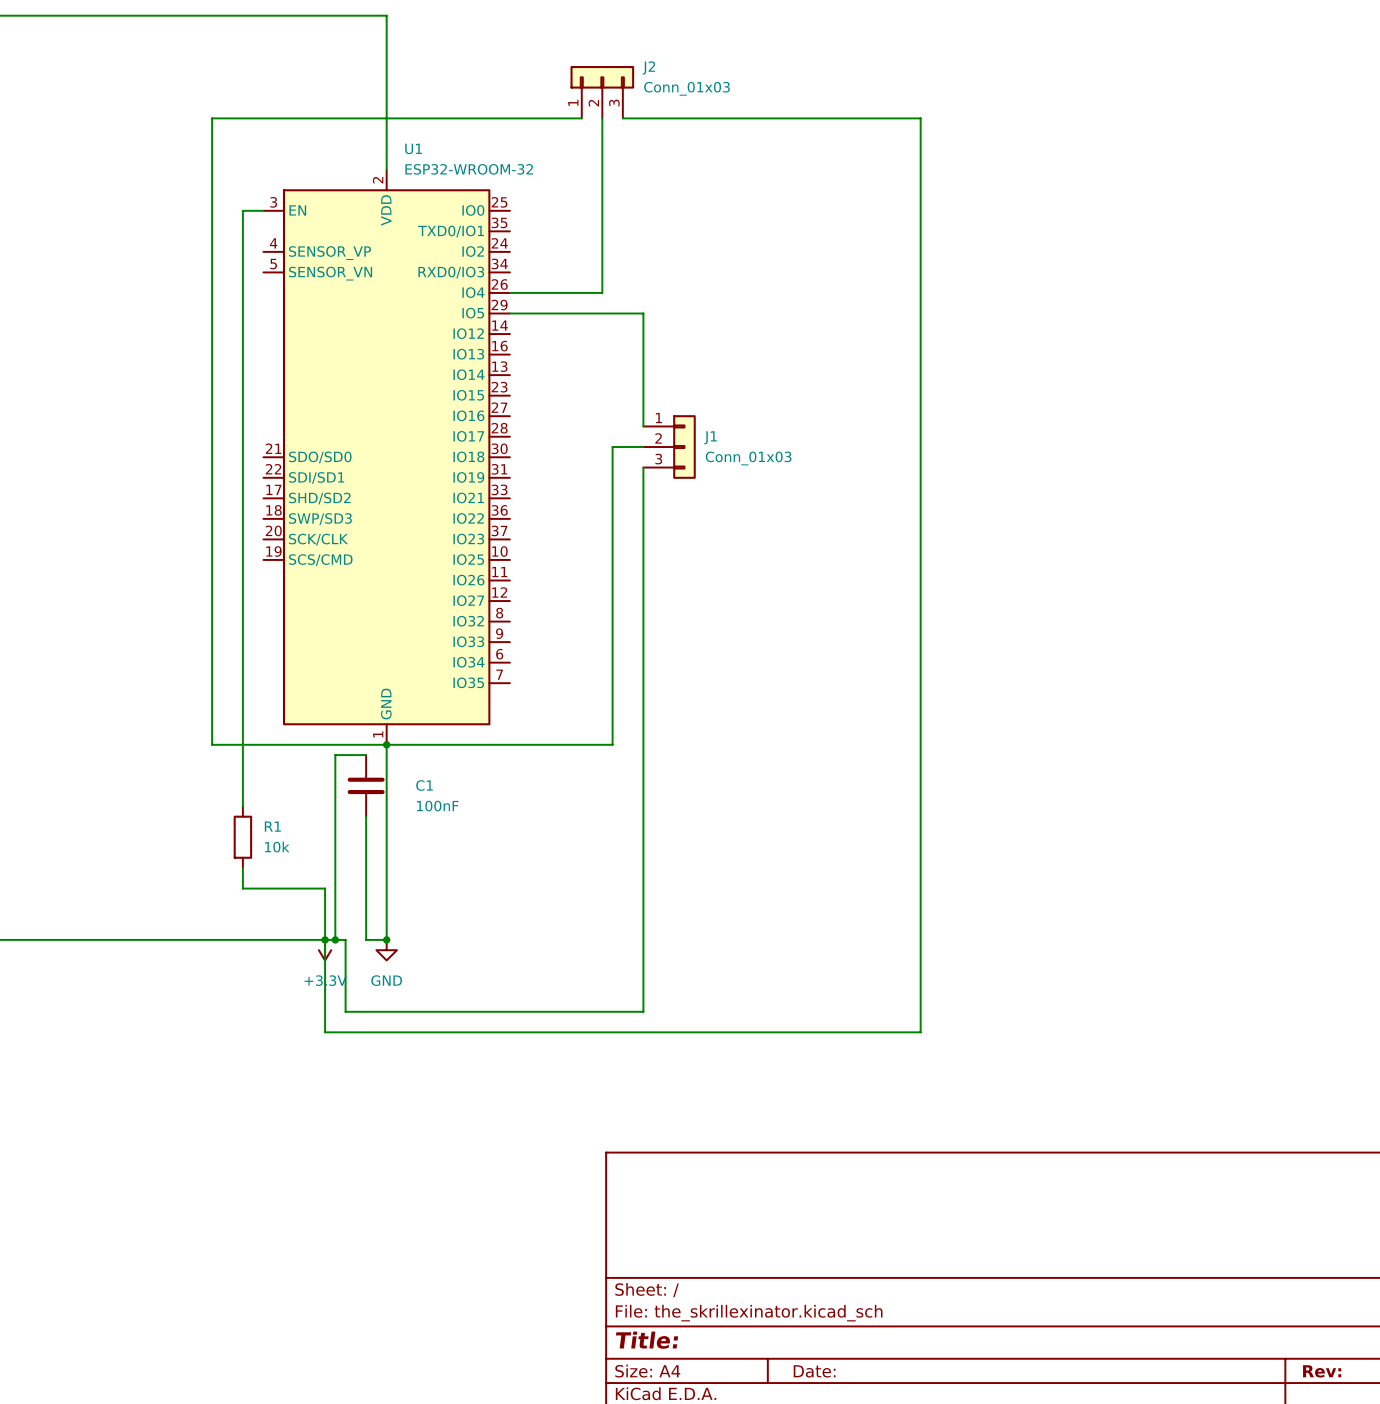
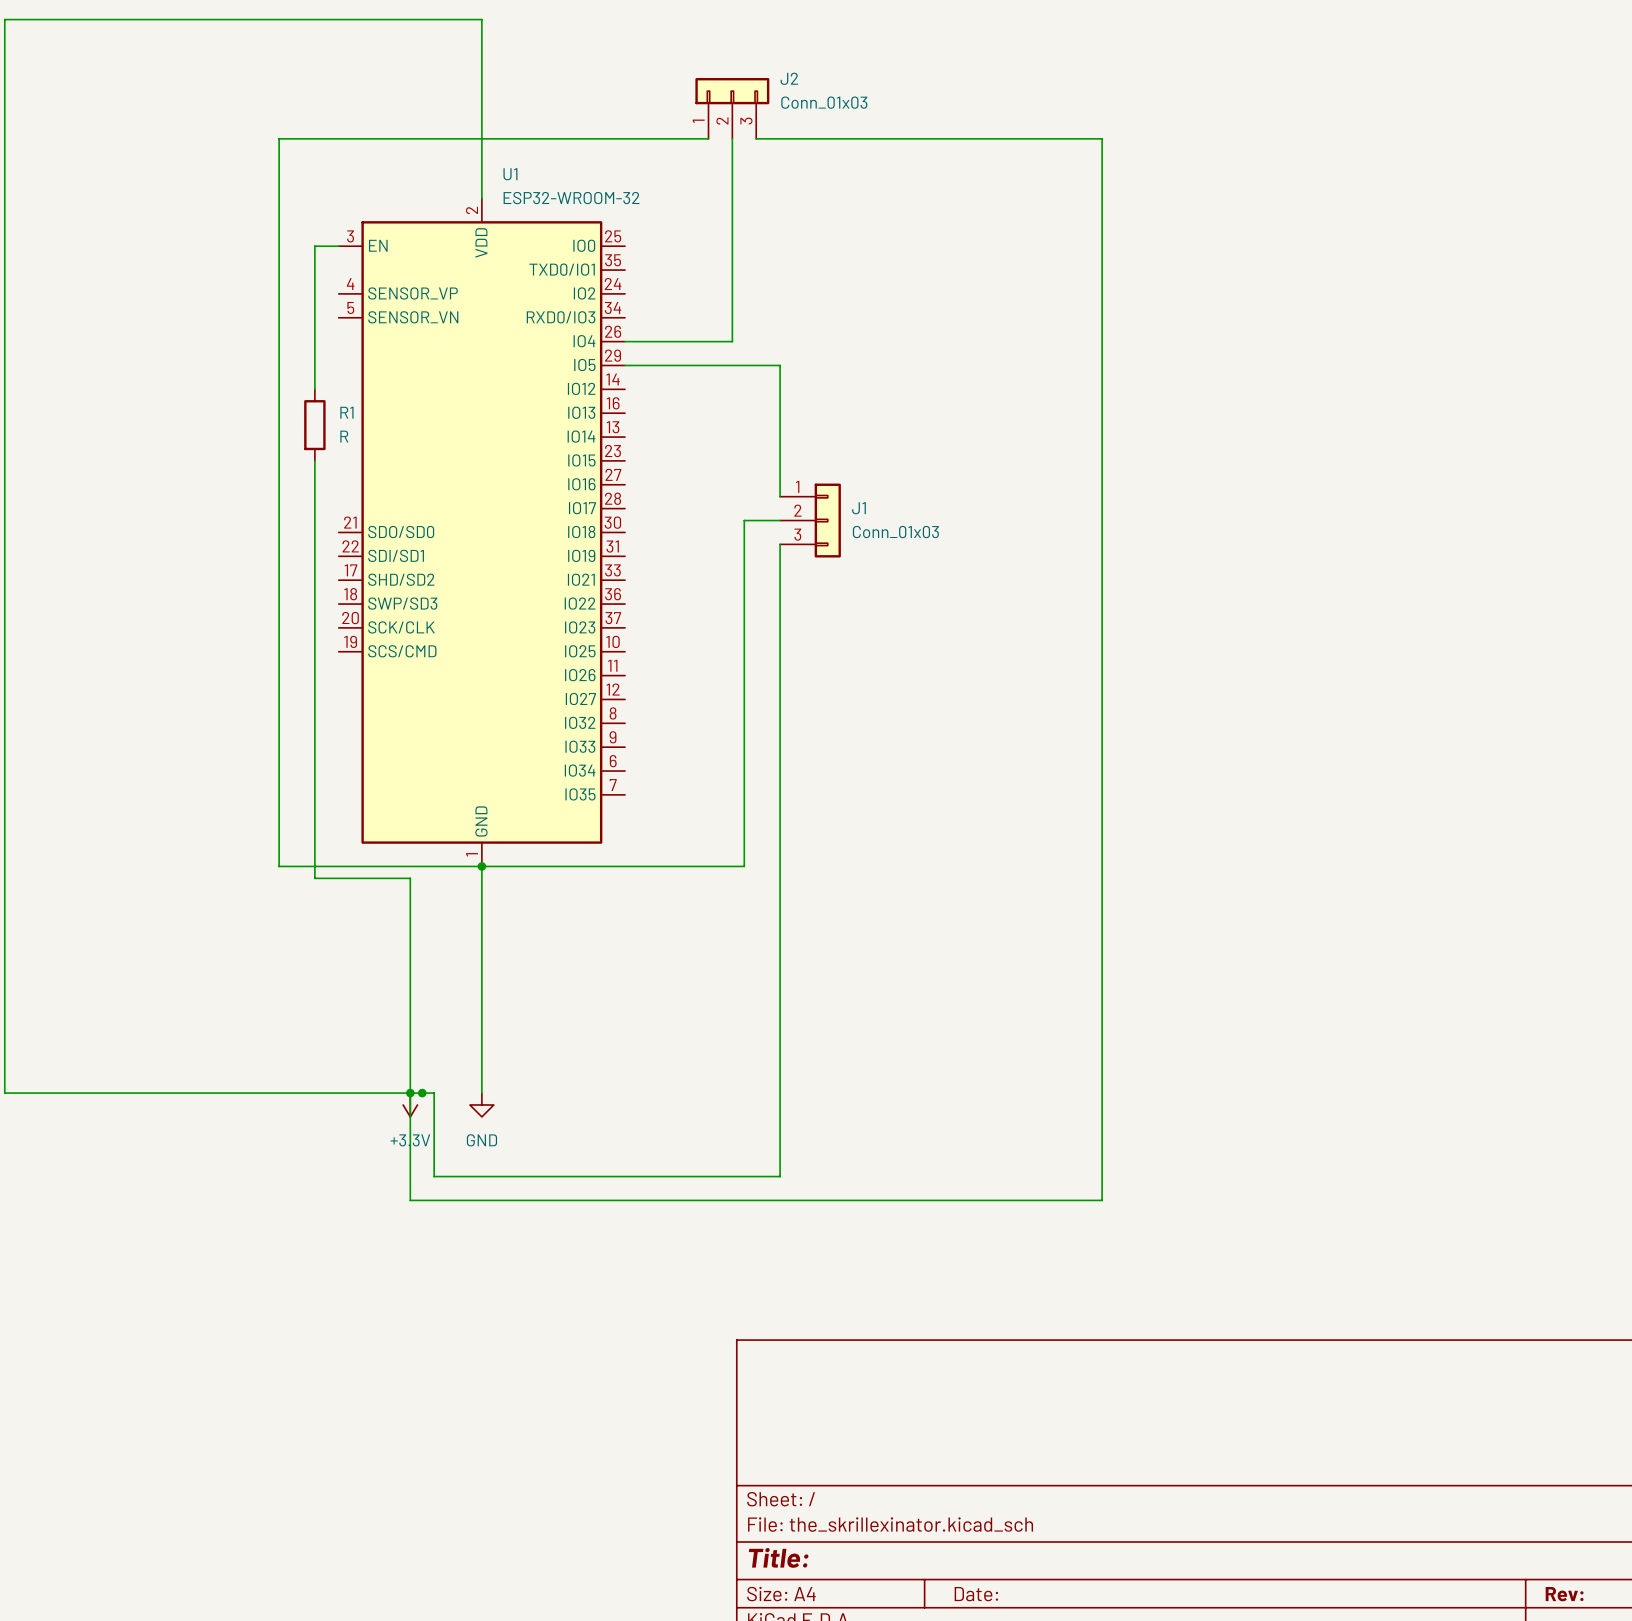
wire: (242, 334) (242, 395) -> none
wire: (242, 755) (242, 806) -> none
wire: (366, 755) (335, 755) (335, 939) -> none
C1: 100nF (366, 785) -> none
wire: (366, 816) (366, 939) (386, 939) -> none
R1 position: (242, 837) -> (314, 425)
R1 value: 10k (277, 846) -> R (344, 436)
wire: (242, 868) (242, 888) (325, 888) -> (314, 878) (410, 878) (410, 1033)
junction: (386, 939) -> none

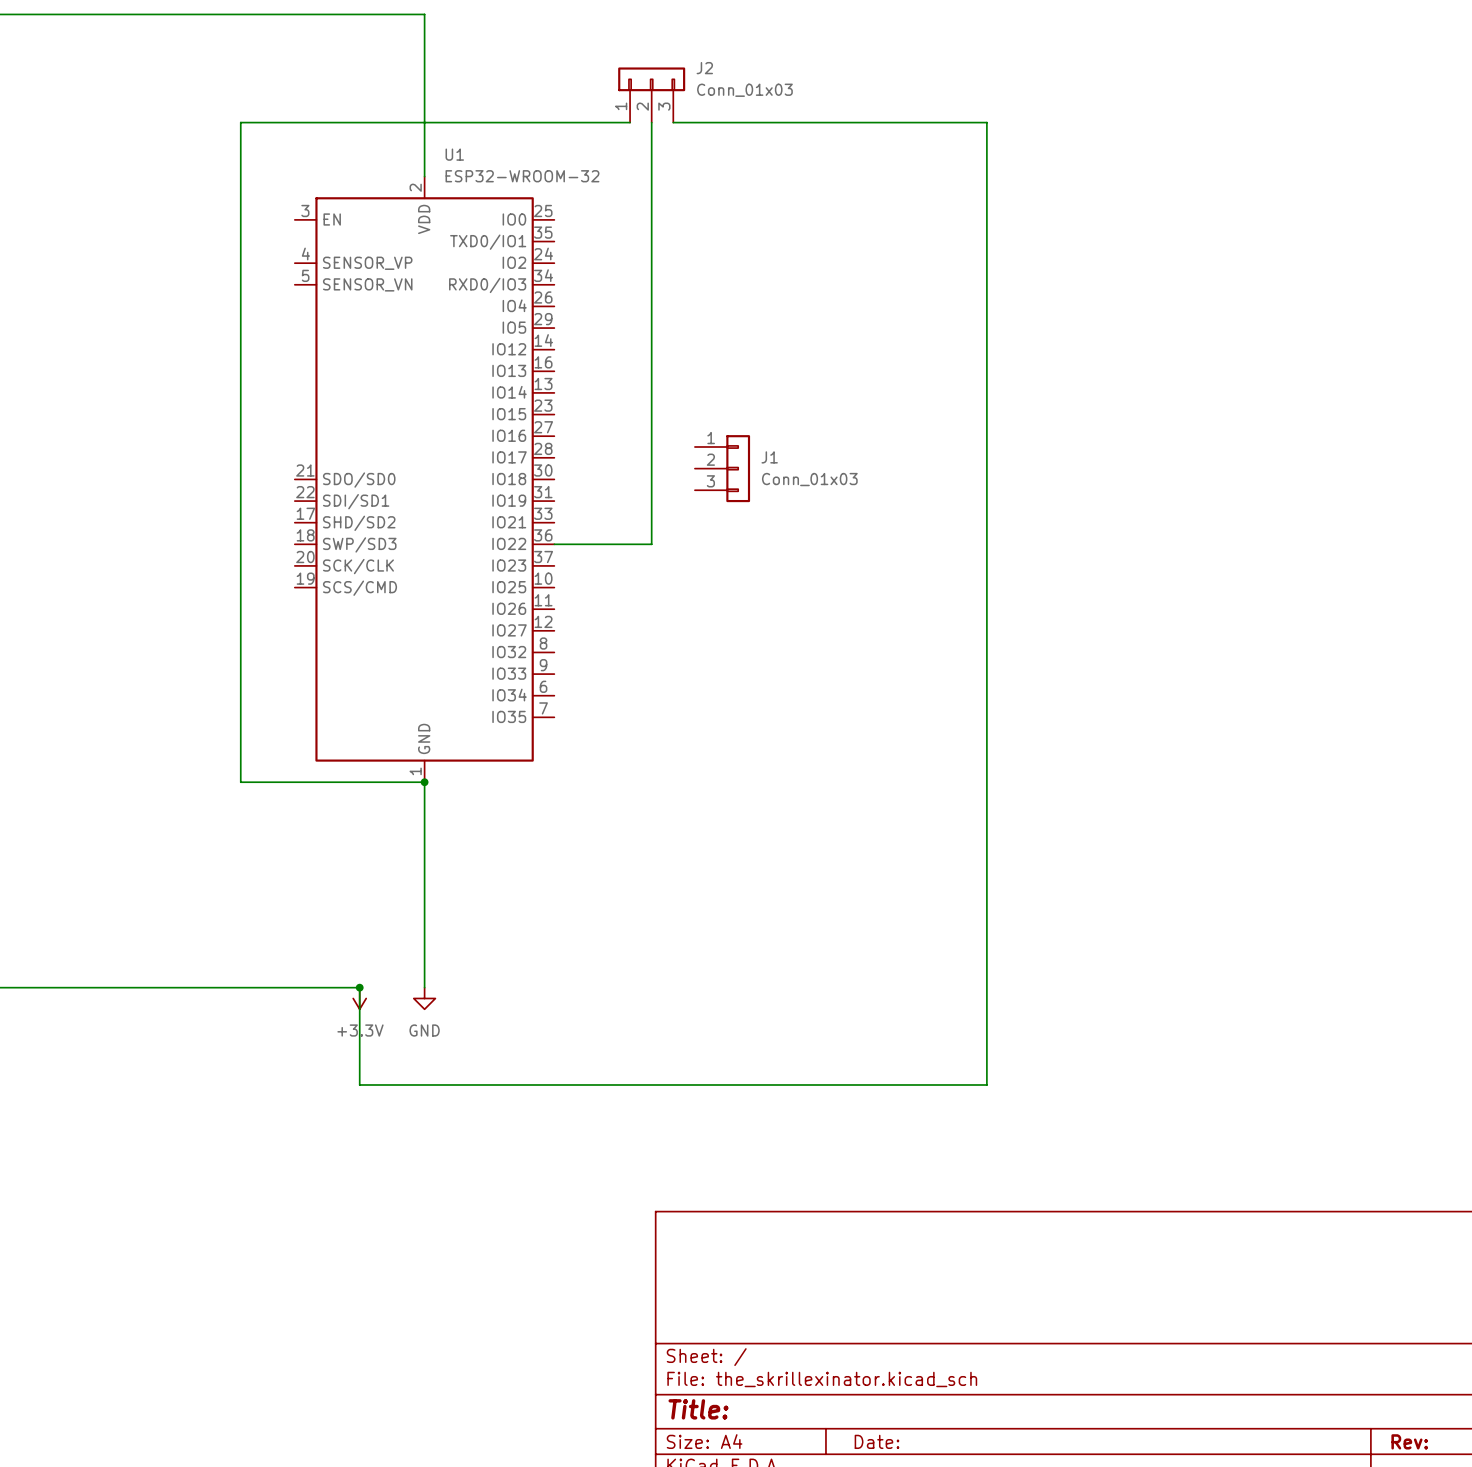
wire: (338, 246) (314, 246) (314, 389) -> none
wire: (625, 341) (732, 341) -> (554, 544) (651, 544) (651, 306)
wire: (625, 365) (780, 365) (780, 496) -> none
R1: R (314, 425) -> none
wire: (314, 460) (314, 878) (410, 878) (410, 1093) (434, 1093) (434, 1176) (780, 1176) (780, 544) -> none
wire: (780, 520) (744, 520) (744, 866) (481, 866) -> none
junction: (422, 1093) -> none

